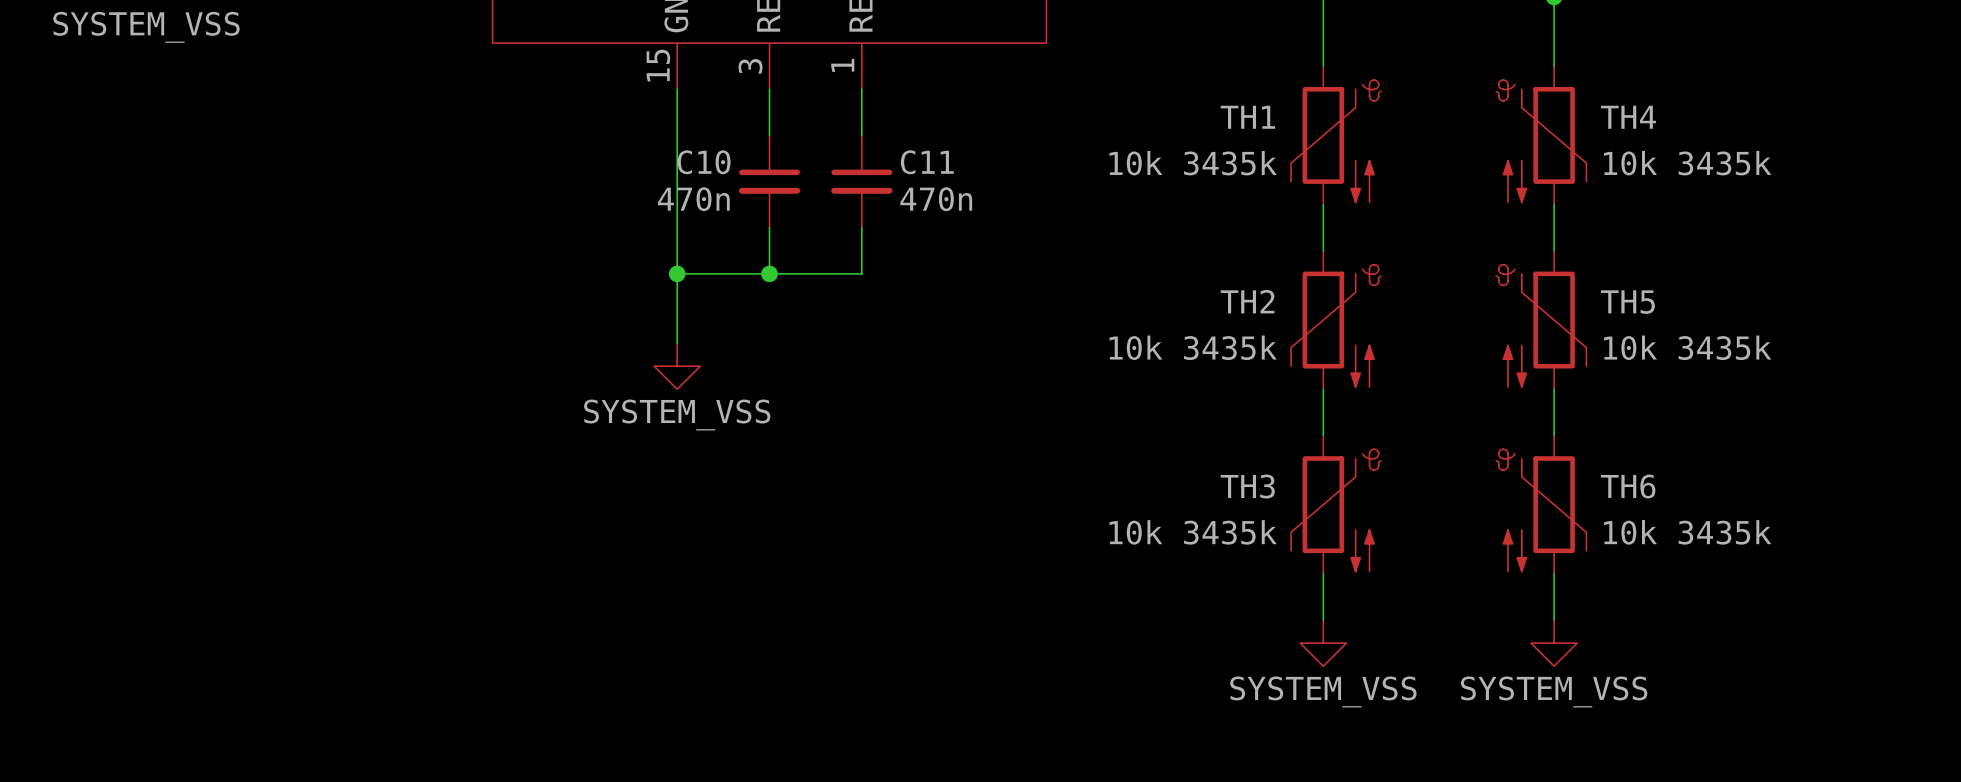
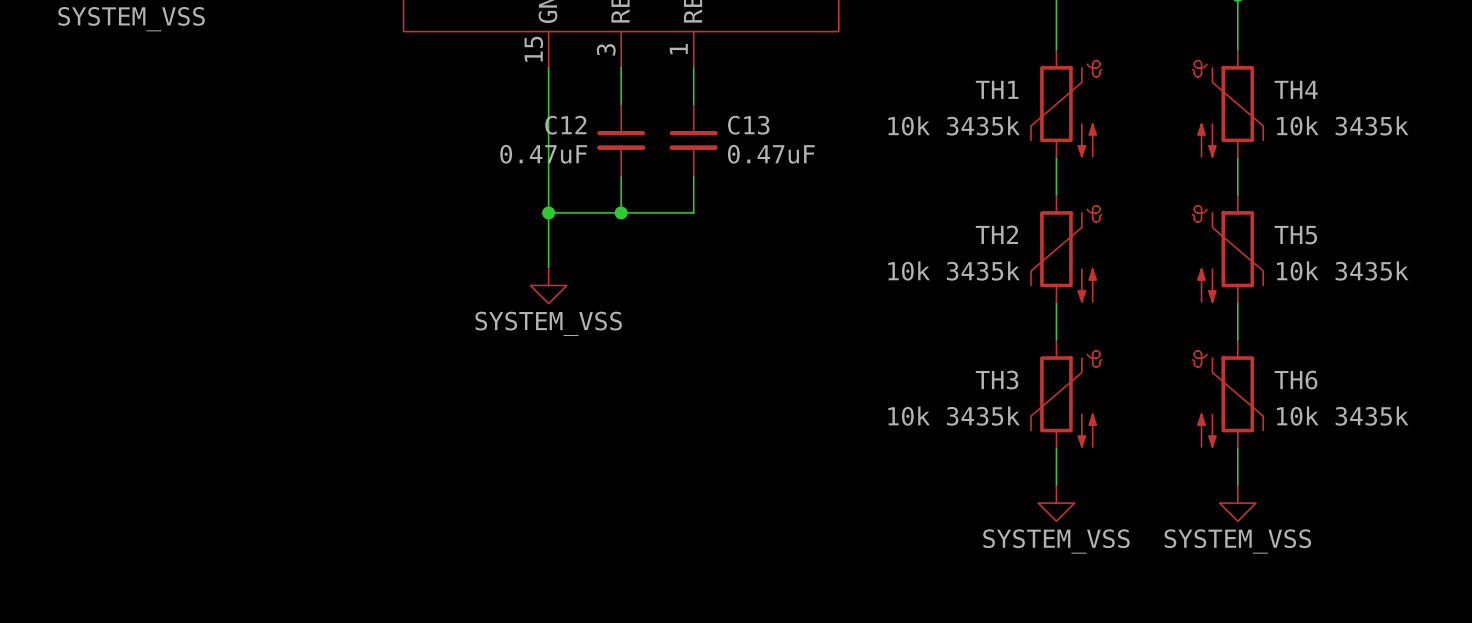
C10 name: C10 (704, 162) -> C12 (565, 125)
C11 name: C11 (927, 162) -> C13 (748, 125)
C10 value: 470n (693, 199) -> 0.47uF (543, 154)
C11 value: 470n (936, 199) -> 0.47uF (771, 154)

